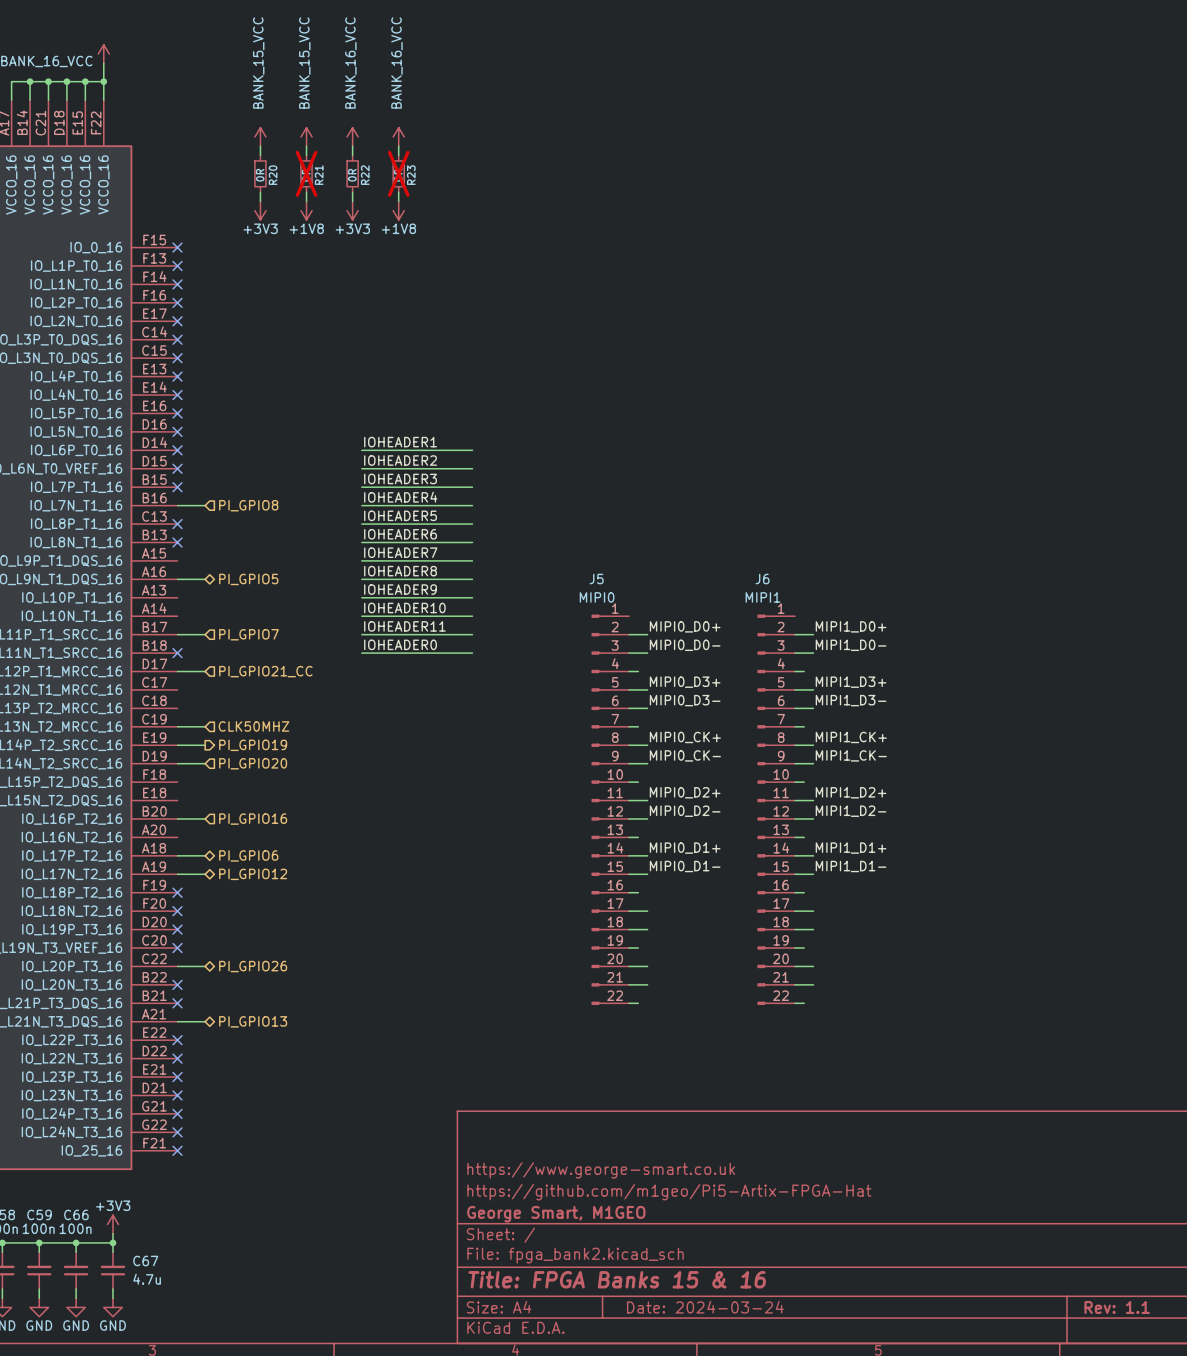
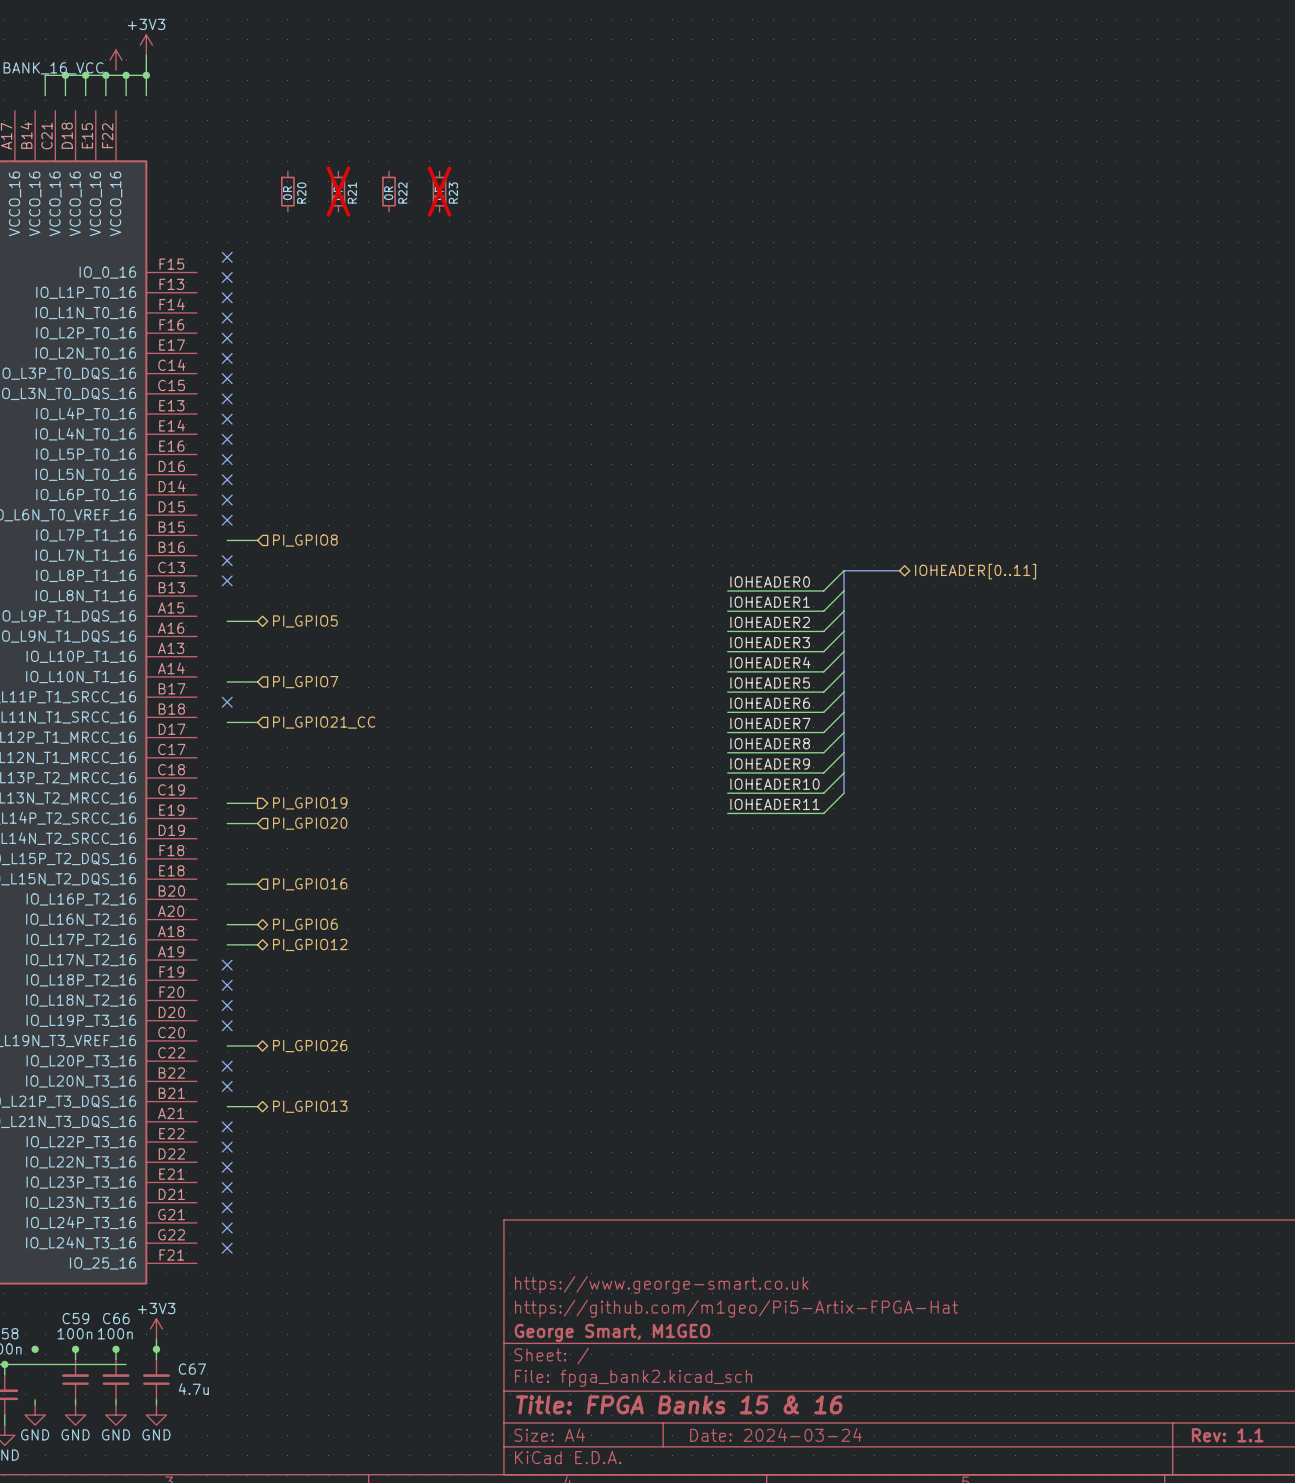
power symbol: none -> +3V3 (146, 45)
wire: (103, 63) (103, 100) -> (146, 55) (146, 95)
junction: none -> (65, 75)
junction: none -> (85, 75)
junction: none -> (105, 75)
junction: none -> (126, 75)
junction: none -> (146, 75)
wire: (30, 81) (30, 100) -> (65, 75) (65, 95)
junction: (30, 81) -> none
wire: (48, 81) (48, 100) -> (85, 75) (85, 95)
junction: (48, 81) -> none
wire: (66, 81) (66, 100) -> (105, 75) (105, 95)
junction: (66, 81) -> none
wire: (85, 81) (85, 100) -> (126, 75) (126, 95)
junction: (85, 81) -> none
wire: (103, 81) (11, 81) (11, 100) -> (146, 75) (45, 75) (45, 95)
junction: (103, 81) -> none
power symbol: BANK_15_VCC (260, 136) -> none
power symbol: BANK_15_VCC (306, 136) -> none
power symbol: BANK_16_VCC (352, 136) -> none
power symbol: BANK_16_VCC (398, 136) -> none
wire: (260, 146) (260, 155) -> none
wire: (306, 146) (306, 155) -> none
wire: (352, 146) (352, 155) -> none
wire: (398, 146) (398, 155) -> none
wire: (260, 192) (260, 201) -> none
wire: (306, 192) (306, 201) -> none
wire: (352, 192) (352, 201) -> none
wire: (398, 192) (398, 201) -> none
power symbol: +3V3 (260, 210) -> none
power symbol: +1V8 (306, 210) -> none
power symbol: +3V3 (352, 210) -> none
power symbol: +1V8 (398, 210) -> none
no-connect mark: none -> (227, 257)
no-connect mark: (177, 247) -> none
no-connect mark: none -> (227, 277)
no-connect mark: (177, 265) -> none
no-connect mark: none -> (227, 297)
no-connect mark: (177, 284) -> none
no-connect mark: none -> (227, 318)
no-connect mark: (177, 302) -> none
no-connect mark: none -> (227, 338)
no-connect mark: (177, 321) -> none
no-connect mark: none -> (227, 358)
no-connect mark: (177, 339) -> none
no-connect mark: none -> (227, 378)
no-connect mark: (177, 358) -> none
no-connect mark: none -> (227, 398)
no-connect mark: (177, 376) -> none
no-connect mark: none -> (227, 419)
no-connect mark: (177, 395) -> none
no-connect mark: none -> (227, 439)
no-connect mark: (177, 413) -> none
no-connect mark: none -> (227, 459)
no-connect mark: (177, 431) -> none
no-connect mark: none -> (227, 479)
label: IOHEADER1 (400, 442) -> none
no-connect mark: (177, 450) -> none
wire: (361, 450) (472, 450) -> none
no-connect mark: none -> (227, 499)
label: IOHEADER2 (400, 460) -> none
no-connect mark: (177, 468) -> none
wire: (361, 468) (472, 468) -> none
no-connect mark: none -> (227, 520)
label: IOHEADER3 (400, 478) -> none
no-connect mark: (177, 487) -> none
wire: (361, 487) (472, 487) -> none
label: IOHEADER4 (400, 497) -> none
wire: (177, 505) (205, 505) -> (227, 540) (257, 540)
hierarchical label position: PI_GPIO8 (248, 505) -> PI_GPIO8 (305, 540)
wire: (361, 505) (472, 505) -> none
no-connect mark: none -> (227, 560)
label: IOHEADER5 (400, 515) -> none
wire: none -> (843, 570) (823, 590) (727, 590)
bus: none -> (899, 570) (843, 570) (843, 793)
hierarchical label: none -> IOHEADER[0..11] (975, 571)
no-connect mark: (177, 524) -> none
wire: (361, 524) (472, 524) -> none
no-connect mark: none -> (227, 580)
label: none -> IOHEADER0 (770, 581)
label: IOHEADER6 (400, 534) -> none
wire: none -> (843, 590) (823, 611)
no-connect mark: (177, 542) -> none
wire: (361, 542) (472, 542) -> none
label: none -> IOHEADER1 (770, 602)
label: IOHEADER7 (400, 552) -> none
wire: none -> (727, 611) (823, 611)
wire: none -> (843, 611) (823, 631) (727, 631)
wire: (361, 560) (472, 560) -> none
label: none -> IOHEADER2 (770, 622)
label: IOHEADER8 (400, 571) -> none
wire: none -> (843, 631) (823, 651)
wire: (177, 579) (205, 579) -> (227, 621) (257, 621)
hierarchical label position: PI_GPIO5 (248, 579) -> PI_GPIO5 (305, 621)
wire: (361, 579) (472, 579) -> none
label: none -> IOHEADER3 (770, 642)
label: IOHEADER9 (400, 589) -> none
wire: none -> (727, 651) (823, 651)
wire: none -> (843, 651) (823, 671) (727, 671)
wire: (361, 597) (472, 597) -> none
label: none -> IOHEADER4 (770, 662)
label: IOHEADER10 (404, 607) -> none
wire: none -> (843, 671) (823, 692)
wire: (361, 616) (472, 616) -> none
label: none -> IOHEADER5 (770, 683)
label: IOHEADER11 (404, 626) -> none
label: MIPI0_D0+ (685, 626) -> none
label: MIPI1_D0+ (851, 626) -> none
wire: none -> (727, 692) (823, 692)
wire: none -> (843, 692) (823, 712) (727, 712)
wire: (177, 634) (205, 634) -> (227, 681) (257, 681)
hierarchical label position: PI_GPIO7 (248, 634) -> PI_GPIO7 (305, 682)
wire: (361, 634) (472, 634) -> none
wire: (629, 634) (647, 634) -> none
wire: (795, 634) (813, 634) -> none
label: none -> IOHEADER6 (770, 703)
label: IOHEADER0 (400, 644) -> none
label: MIPI0_D0- (685, 645) -> none
label: MIPI1_D0- (851, 645) -> none
wire: none -> (843, 712) (823, 732) (727, 732)
no-connect mark position: (177, 653) -> (227, 702)
wire: (361, 653) (472, 653) -> none
wire: (629, 653) (647, 653) -> none
wire: (795, 653) (813, 653) -> none
label: none -> IOHEADER7 (770, 723)
wire: none -> (843, 732) (823, 752)
wire: (177, 671) (205, 671) -> (227, 722) (257, 722)
hierarchical label position: PI_GPIO21_CC (265, 671) -> PI_GPIO21_CC (324, 722)
wire: (629, 671) (638, 671) -> none
wire: (795, 671) (804, 671) -> none
label: none -> IOHEADER8 (770, 743)
label: MIPI0_D3+ (685, 682) -> none
label: MIPI1_D3+ (851, 682) -> none
wire: none -> (727, 752) (823, 752)
wire: none -> (843, 752) (823, 772) (727, 772)
wire: (629, 689) (647, 689) -> none
wire: (795, 689) (813, 689) -> none
label: none -> IOHEADER9 (770, 763)
label: MIPI0_D3- (685, 700) -> none
label: MIPI1_D3- (851, 700) -> none
wire: none -> (843, 772) (823, 793)
wire: (629, 708) (647, 708) -> none
wire: (795, 708) (813, 708) -> none
label: none -> IOHEADER10 (774, 784)
wire: none -> (727, 793) (823, 793)
wire: none -> (843, 793) (823, 813) (727, 813)
wire: (177, 726) (205, 726) -> none
hierarchical label: CLK50MHZ (254, 726) -> none
wire: (629, 726) (638, 726) -> none
wire: (795, 726) (804, 726) -> none
label: none -> IOHEADER11 (774, 804)
label: MIPI0_CK+ (685, 737) -> none
label: MIPI1_CK+ (851, 737) -> none
wire: (177, 745) (205, 745) -> (227, 803) (257, 803)
hierarchical label position: PI_GPIO19 (253, 745) -> PI_GPIO19 (310, 803)
wire: (629, 745) (647, 745) -> none
wire: (795, 745) (813, 745) -> none
label: MIPI0_CK- (685, 755) -> none
label: MIPI1_CK- (851, 755) -> none
wire: (177, 763) (205, 763) -> (227, 823) (257, 823)
hierarchical label position: PI_GPIO20 (253, 763) -> PI_GPIO20 (310, 823)
wire: (629, 763) (647, 763) -> none
wire: (795, 763) (813, 763) -> none
wire: (629, 782) (638, 782) -> none
wire: (795, 782) (804, 782) -> none
label: MIPI0_D2+ (685, 792) -> none
label: MIPI1_D2+ (851, 792) -> none
wire: (629, 800) (647, 800) -> none
wire: (795, 800) (813, 800) -> none
J5: MIPI0 (610, 809) -> none
J6: MIPI1 (776, 809) -> none
label: MIPI0_D2- (685, 811) -> none
label: MIPI1_D2- (851, 811) -> none
wire: (177, 818) (205, 818) -> (227, 884) (257, 884)
wire: (629, 818) (647, 818) -> none
wire: (795, 818) (813, 818) -> none
hierarchical label position: PI_GPIO16 (253, 819) -> PI_GPIO16 (310, 884)
wire: (629, 837) (638, 837) -> none
wire: (795, 837) (804, 837) -> none
label: MIPI0_D1+ (685, 848) -> none
label: MIPI1_D1+ (851, 848) -> none
wire: (177, 855) (205, 855) -> (227, 924) (257, 924)
hierarchical label position: PI_GPIO6 (248, 855) -> PI_GPIO6 (305, 924)
wire: (629, 855) (647, 855) -> none
wire: (795, 855) (813, 855) -> none
label: MIPI0_D1- (685, 866) -> none
label: MIPI1_D1- (851, 866) -> none
wire: (177, 874) (205, 874) -> (227, 944) (257, 944)
hierarchical label position: PI_GPIO12 (253, 874) -> PI_GPIO12 (310, 944)
wire: (629, 874) (647, 874) -> none
wire: (795, 874) (813, 874) -> none
no-connect mark: none -> (227, 965)
no-connect mark: (177, 892) -> none
wire: (629, 892) (638, 892) -> none
wire: (795, 892) (804, 892) -> none
no-connect mark: none -> (227, 985)
no-connect mark: (177, 911) -> none
wire: (629, 911) (647, 911) -> none
wire: (795, 911) (813, 911) -> none
no-connect mark: none -> (227, 1005)
no-connect mark: (177, 929) -> none
wire: (629, 929) (647, 929) -> none
wire: (795, 929) (813, 929) -> none
no-connect mark: none -> (227, 1025)
no-connect mark: (177, 948) -> none
wire: (629, 948) (638, 948) -> none
wire: (795, 948) (804, 948) -> none
wire: (177, 966) (205, 966) -> (227, 1045) (257, 1045)
hierarchical label position: PI_GPIO26 (253, 966) -> PI_GPIO26 (310, 1046)
wire: (629, 966) (647, 966) -> none
wire: (795, 966) (813, 966) -> none
no-connect mark: none -> (227, 1066)
no-connect mark: (177, 984) -> none
wire: (629, 984) (647, 984) -> none
wire: (795, 984) (813, 984) -> none
no-connect mark: none -> (227, 1086)
no-connect mark: (177, 1003) -> none
wire: (629, 1003) (638, 1003) -> none
wire: (795, 1003) (804, 1003) -> none
wire: (177, 1021) (205, 1021) -> (227, 1106) (257, 1106)
hierarchical label position: PI_GPIO13 (253, 1021) -> PI_GPIO13 (310, 1106)
no-connect mark: none -> (227, 1126)
no-connect mark: (177, 1040) -> none
no-connect mark: none -> (227, 1147)
no-connect mark: (177, 1058) -> none
no-connect mark: none -> (227, 1167)
no-connect mark: (177, 1077) -> none
no-connect mark: none -> (227, 1187)
no-connect mark: (177, 1095) -> none
no-connect mark: none -> (227, 1207)
no-connect mark: (177, 1113) -> none
no-connect mark: none -> (227, 1227)
no-connect mark: (177, 1132) -> none
no-connect mark: none -> (227, 1248)
no-connect mark: (177, 1150) -> none
power symbol position: +3V3 (112, 1224) -> +3V3 (156, 1329)
junction: none -> (35, 1349)
junction: none -> (75, 1349)
junction: none -> (116, 1349)
junction: none -> (156, 1349)
wire: (112, 1233) (112, 1252) -> (156, 1339) (156, 1359)
wire: (39, 1242) (39, 1252) -> (75, 1349) (75, 1359)
junction: (39, 1242) -> none
wire: (76, 1242) (76, 1252) -> (116, 1349) (116, 1359)
junction: (76, 1242) -> none
junction: (112, 1242) -> none
C59 position: (39, 1270) -> (75, 1379)
C66 position: (76, 1270) -> (116, 1379)
C67 position: (112, 1270) -> (156, 1379)
wire: none -> (35, 1399) (35, 1404)
wire: none -> (75, 1399) (75, 1404)
wire: none -> (116, 1399) (116, 1404)
wire: none -> (156, 1399) (156, 1404)
power symbol: none -> GND (35, 1415)
wire: (39, 1289) (39, 1298) -> none
power symbol: none -> GND (75, 1415)
wire: (76, 1289) (76, 1298) -> none
power symbol: none -> GND (116, 1415)
wire: (112, 1289) (112, 1298) -> none
power symbol: none -> GND (156, 1415)
power symbol: GND (39, 1307) -> none
power symbol: GND (76, 1307) -> none
power symbol: GND (112, 1307) -> none

